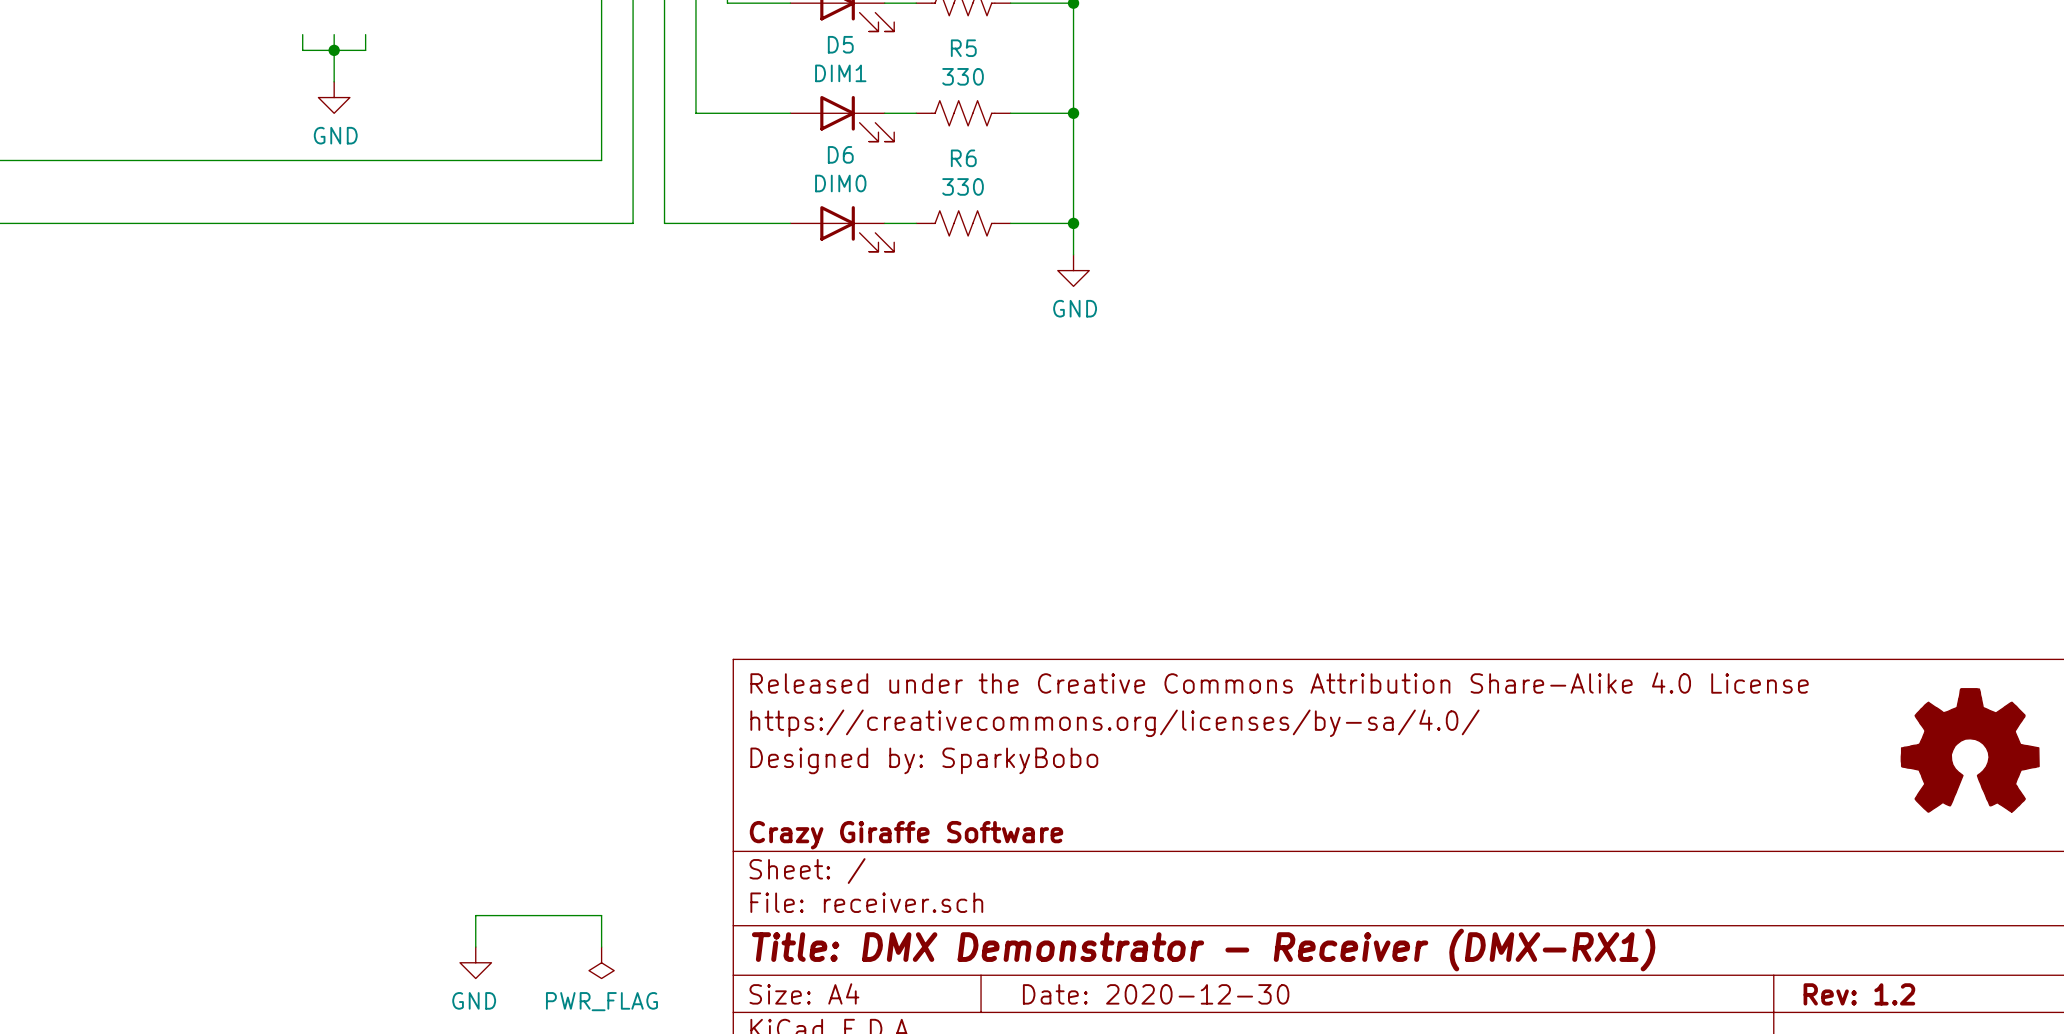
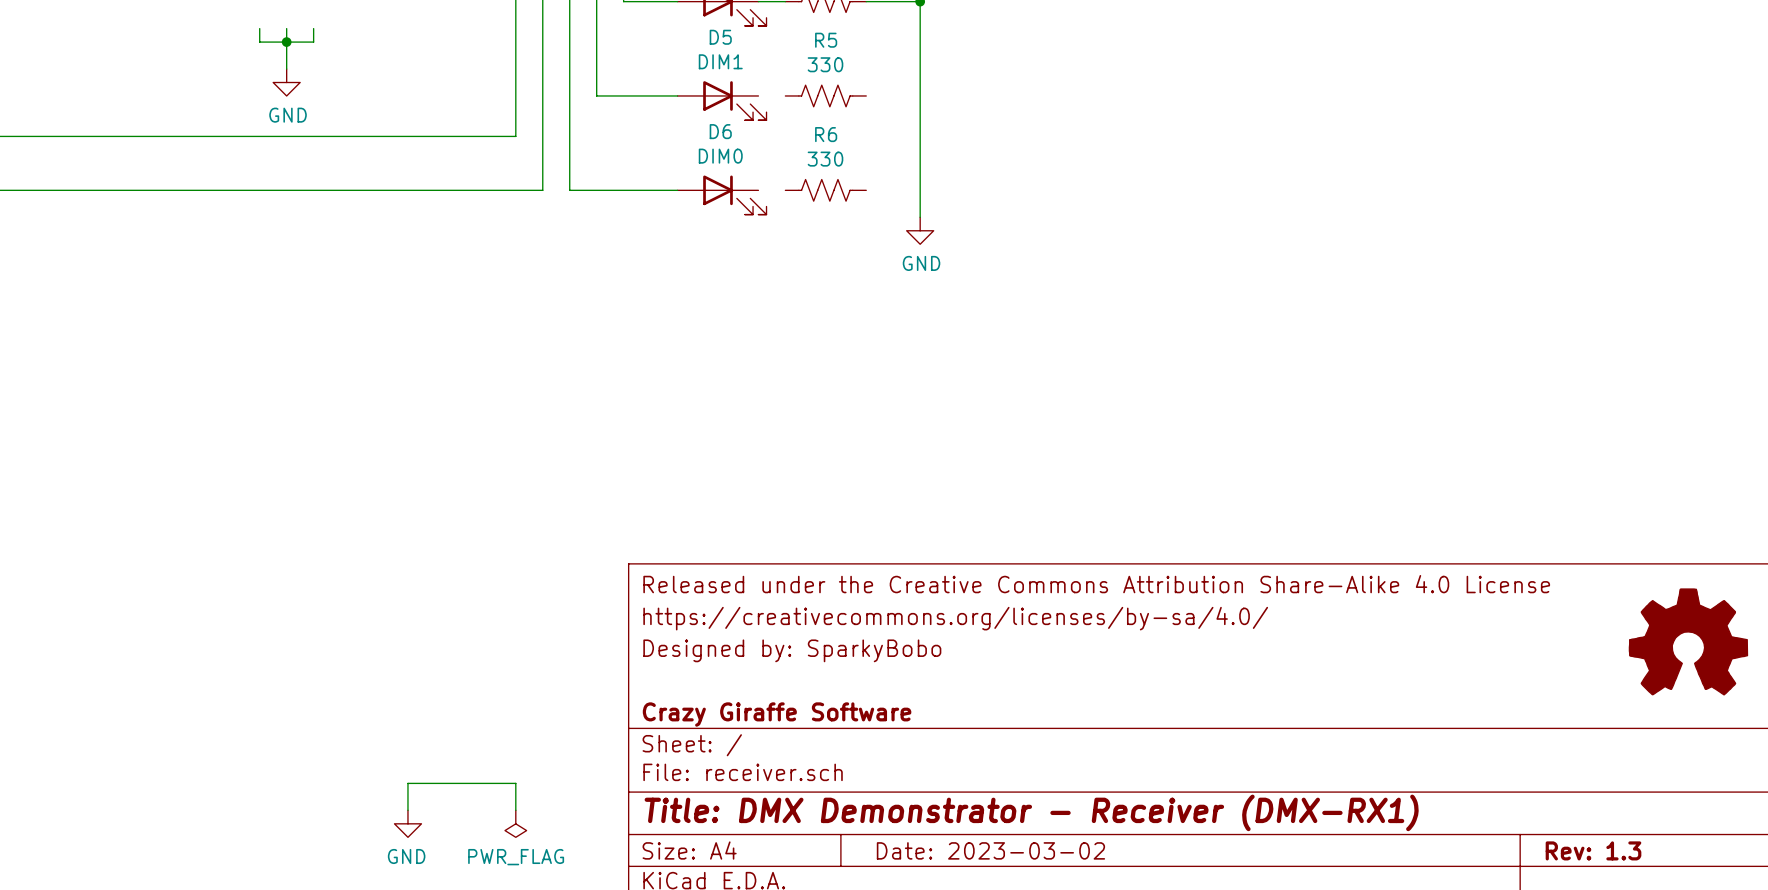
wire: (884, 113) (916, 113) -> none
wire: (1010, 113) (1073, 113) -> none
junction: (1073, 113) -> none
wire: (884, 223) (916, 223) -> none
wire: (1010, 223) (1073, 223) -> none
junction: (1073, 223) -> none
title block: Date: 2020-12-30 (1156, 994) -> Date: 2023-03-02 (990, 850)
title block: Rev: 1.2 (1859, 994) -> Rev: 1.3 (1593, 850)

